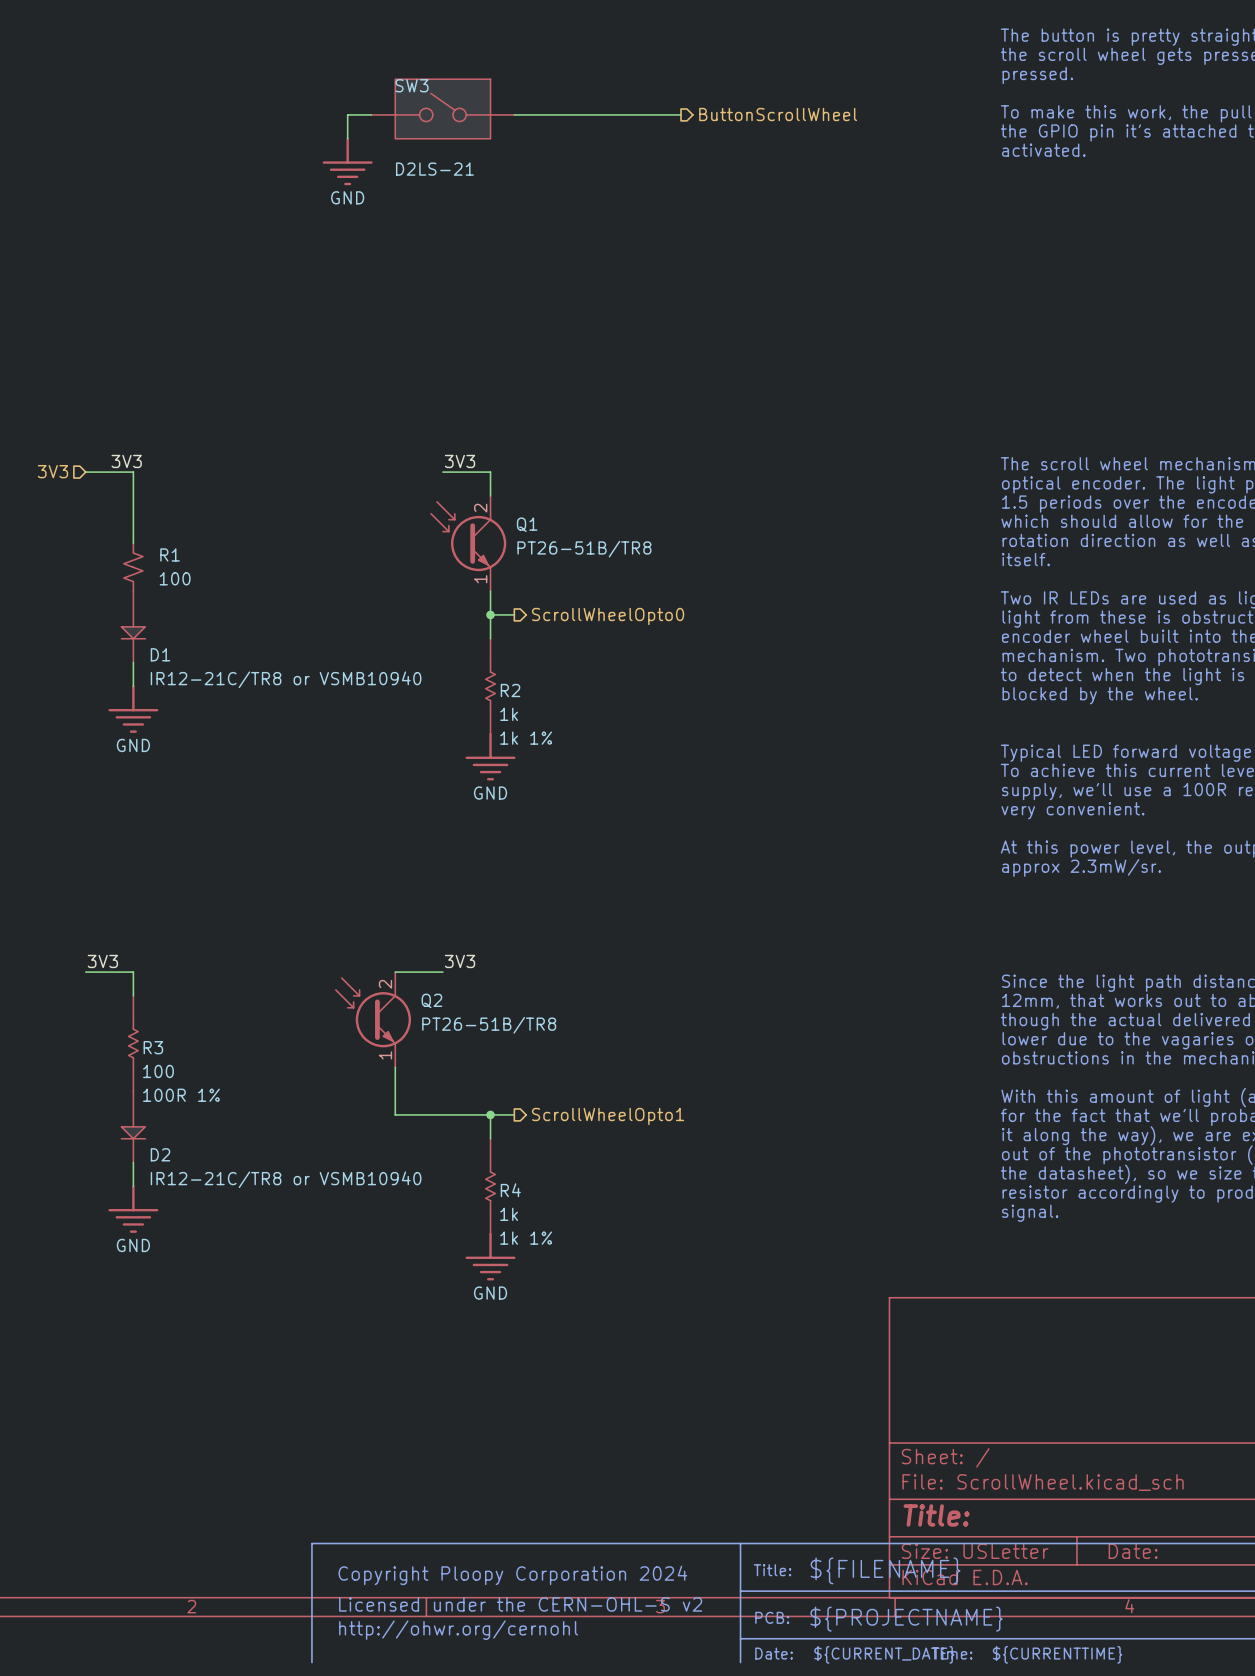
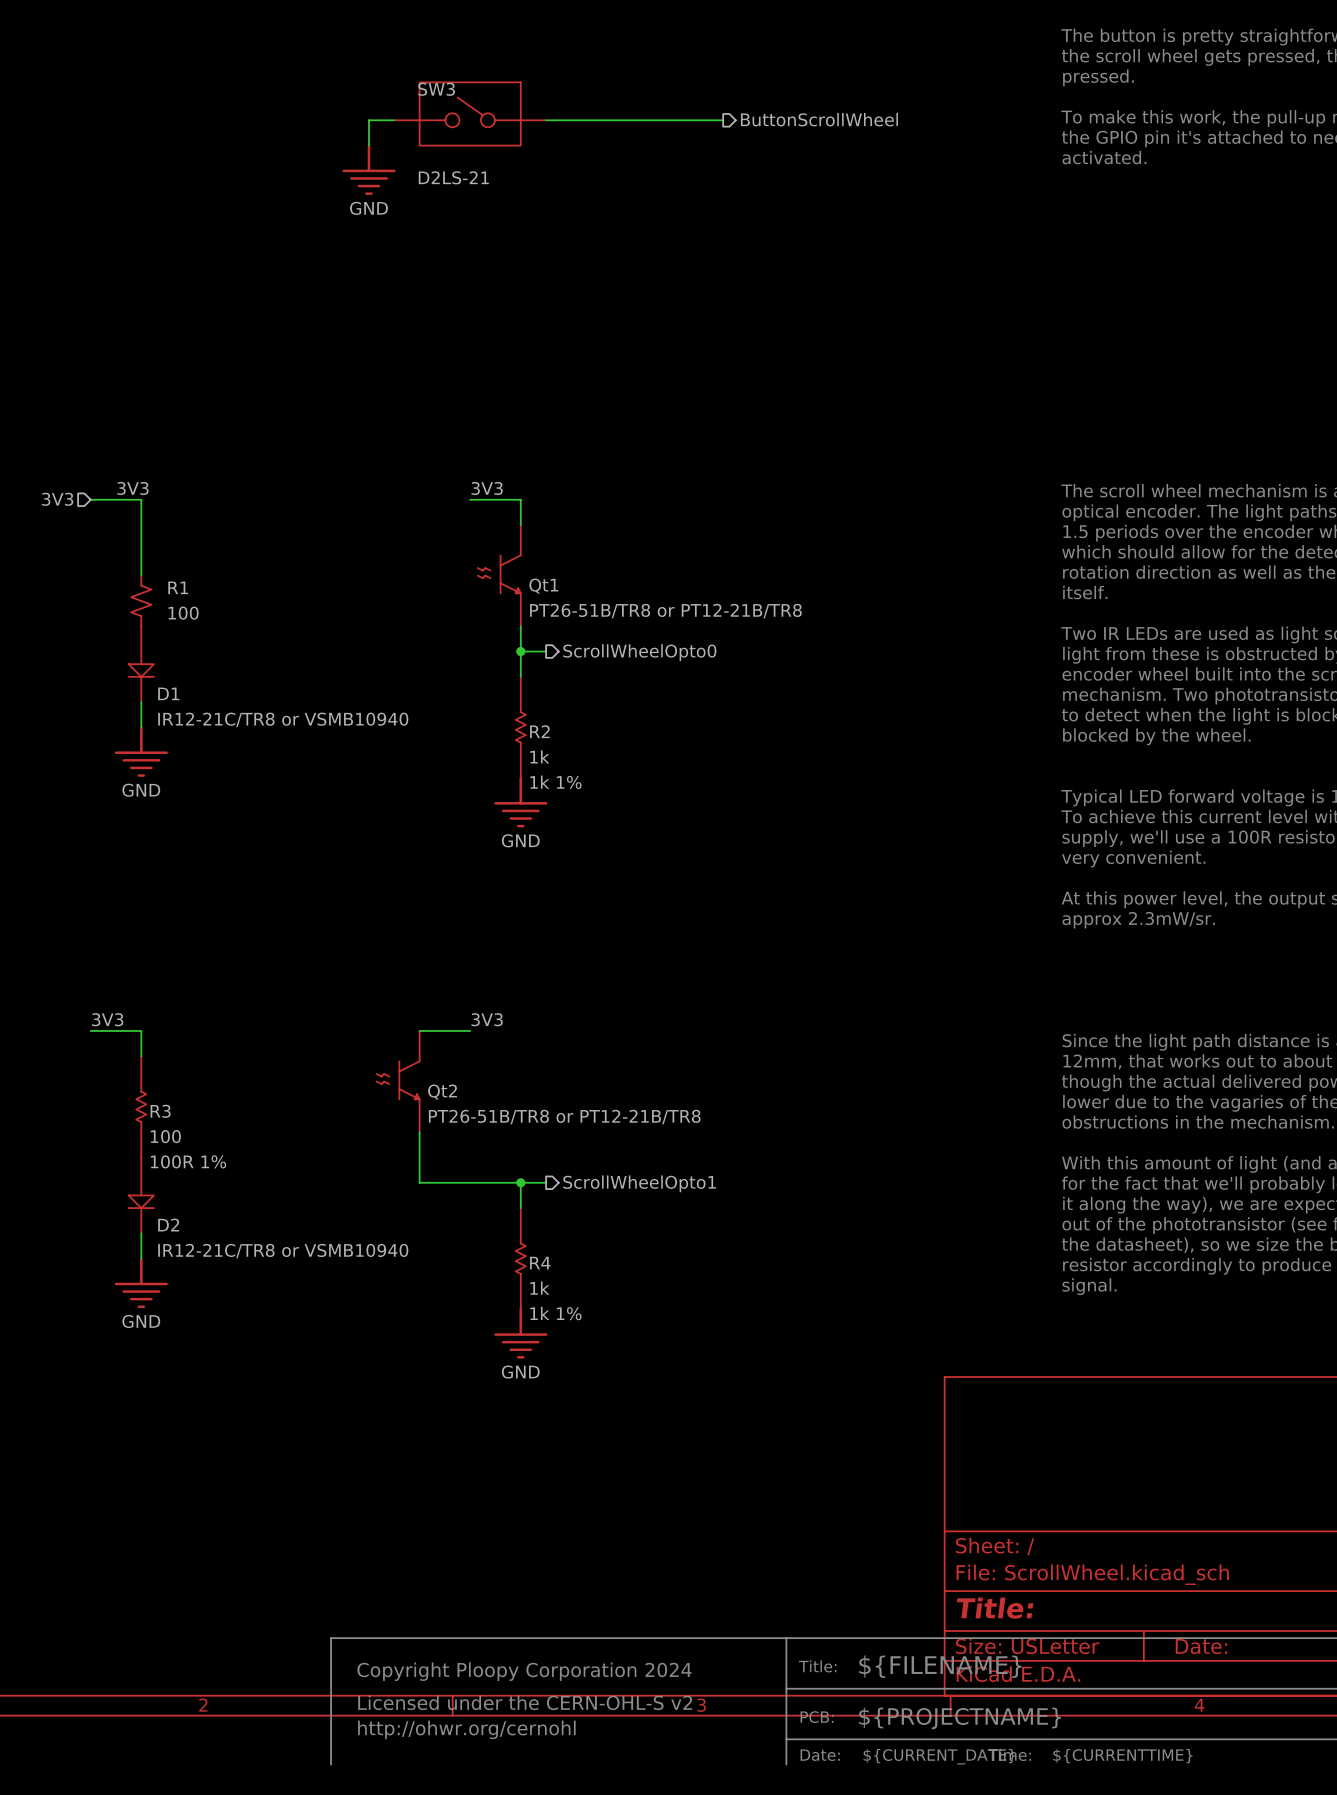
Q1: PT26-51B/TR8 (468, 543) -> none
Qt1: none -> PT26-51B/TR8 or PT12-21B/TR8 (499, 575)
Q2: PT26-51B/TR8 (373, 1019) -> none
Qt2: none -> PT26-51B/TR8 or PT12-21B/TR8 (398, 1081)

